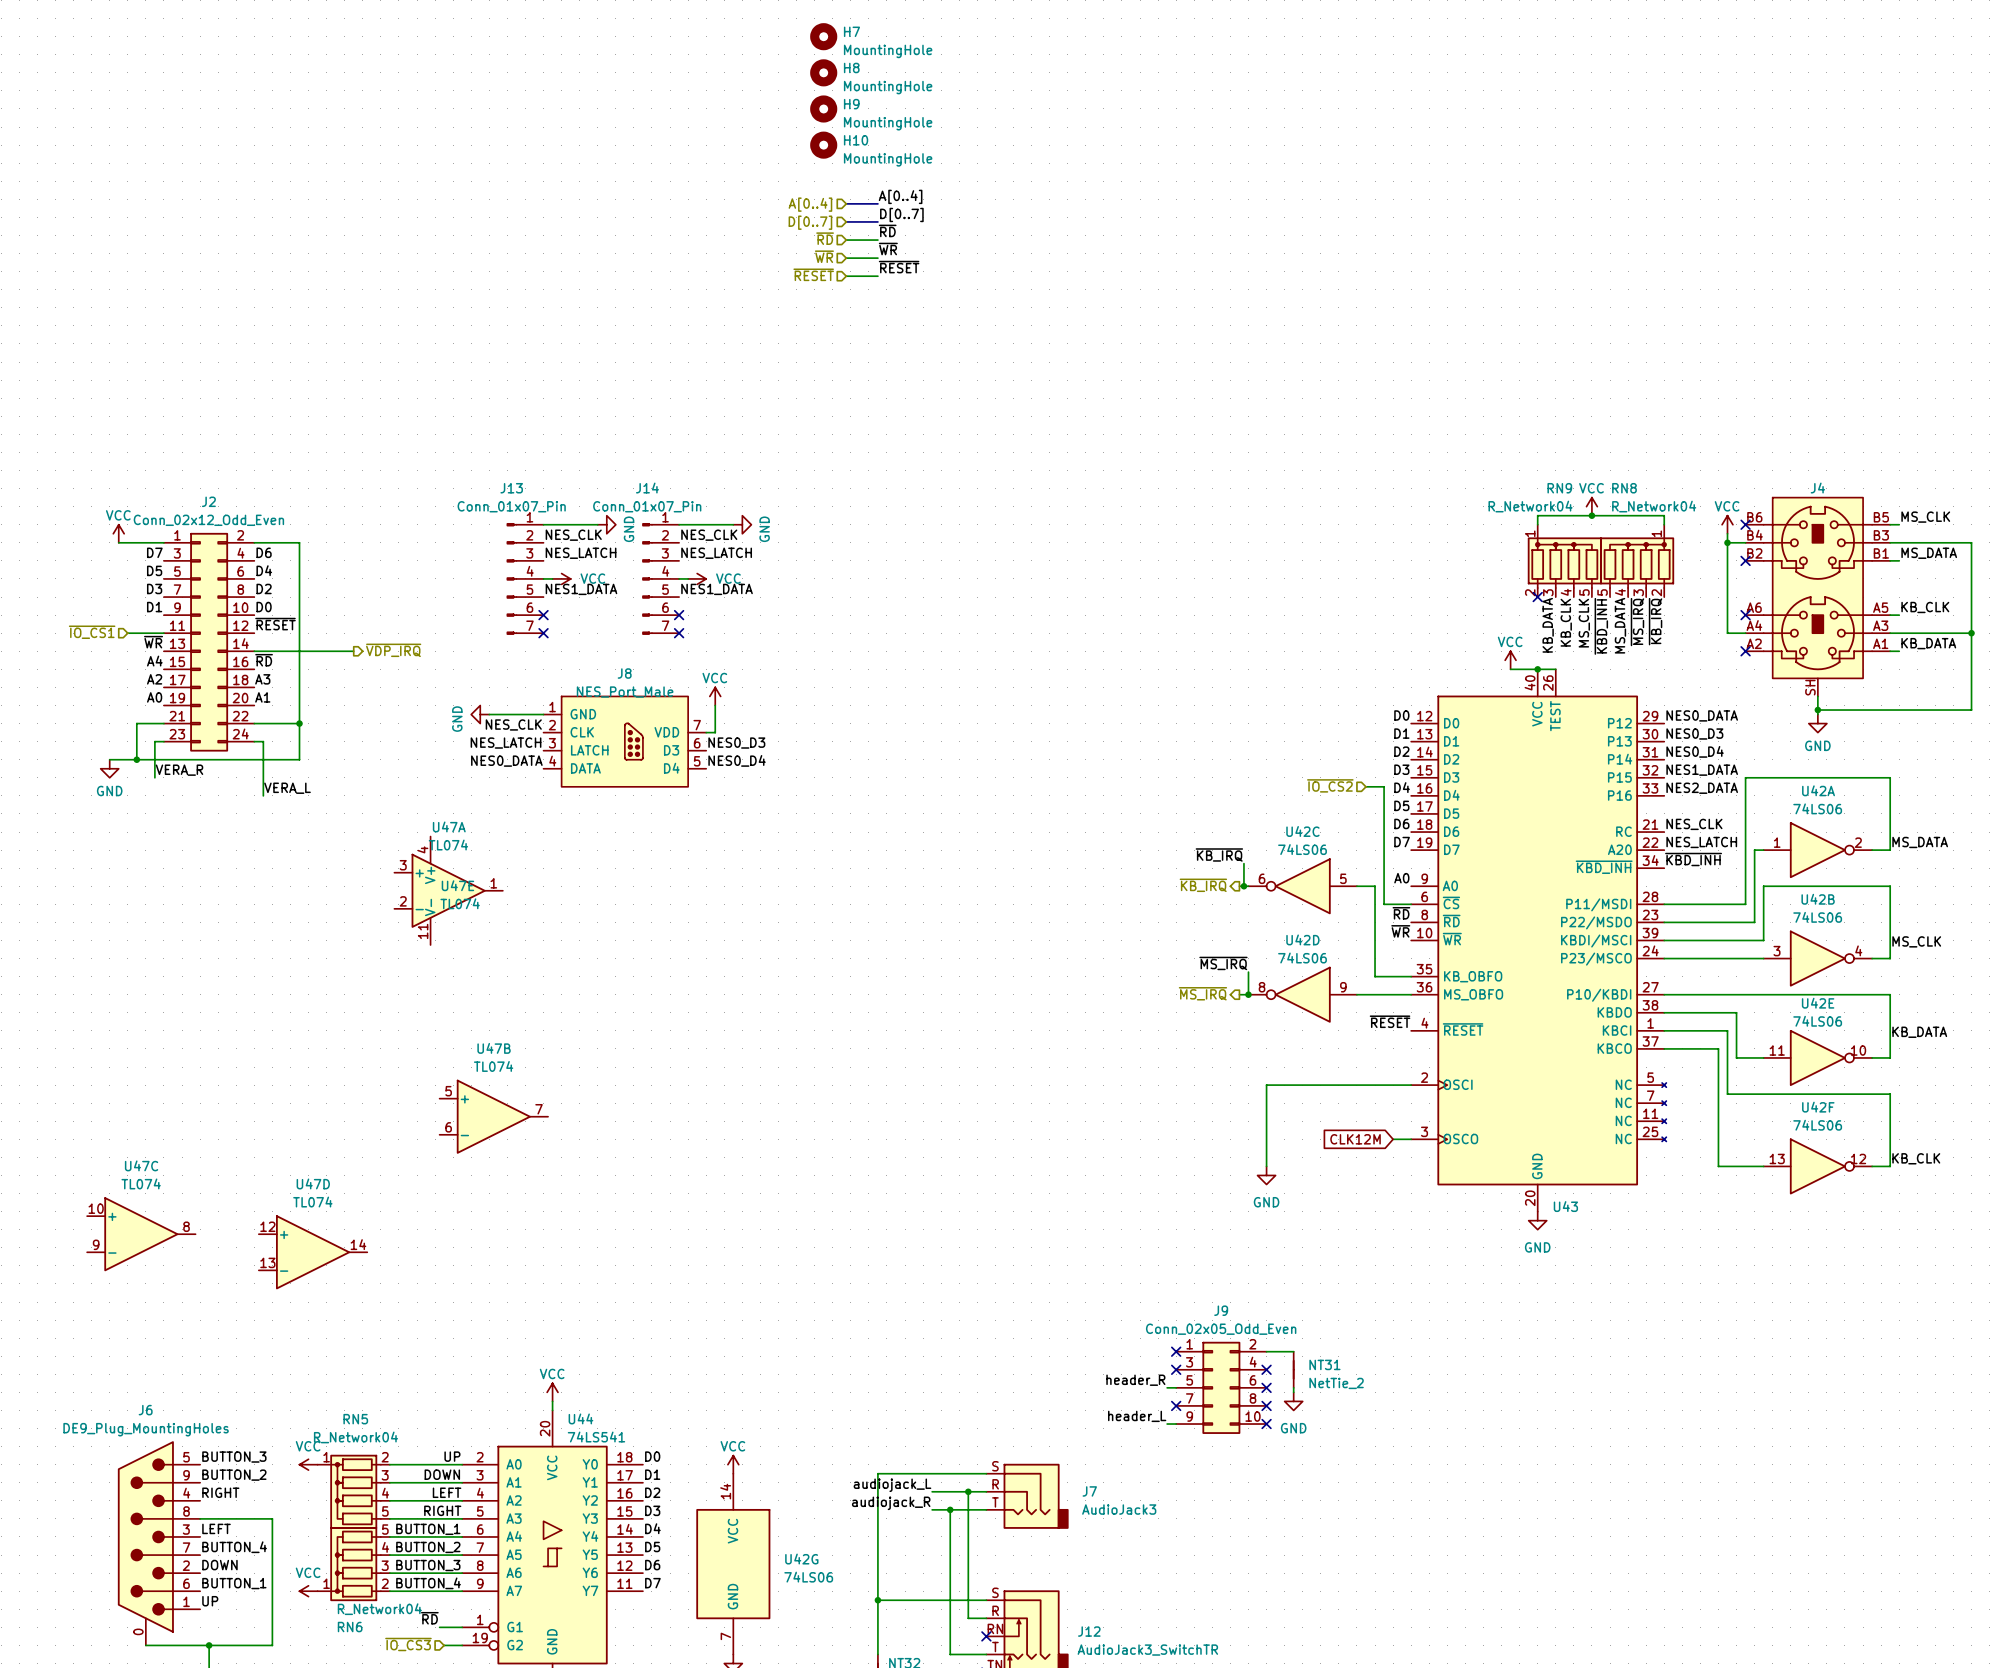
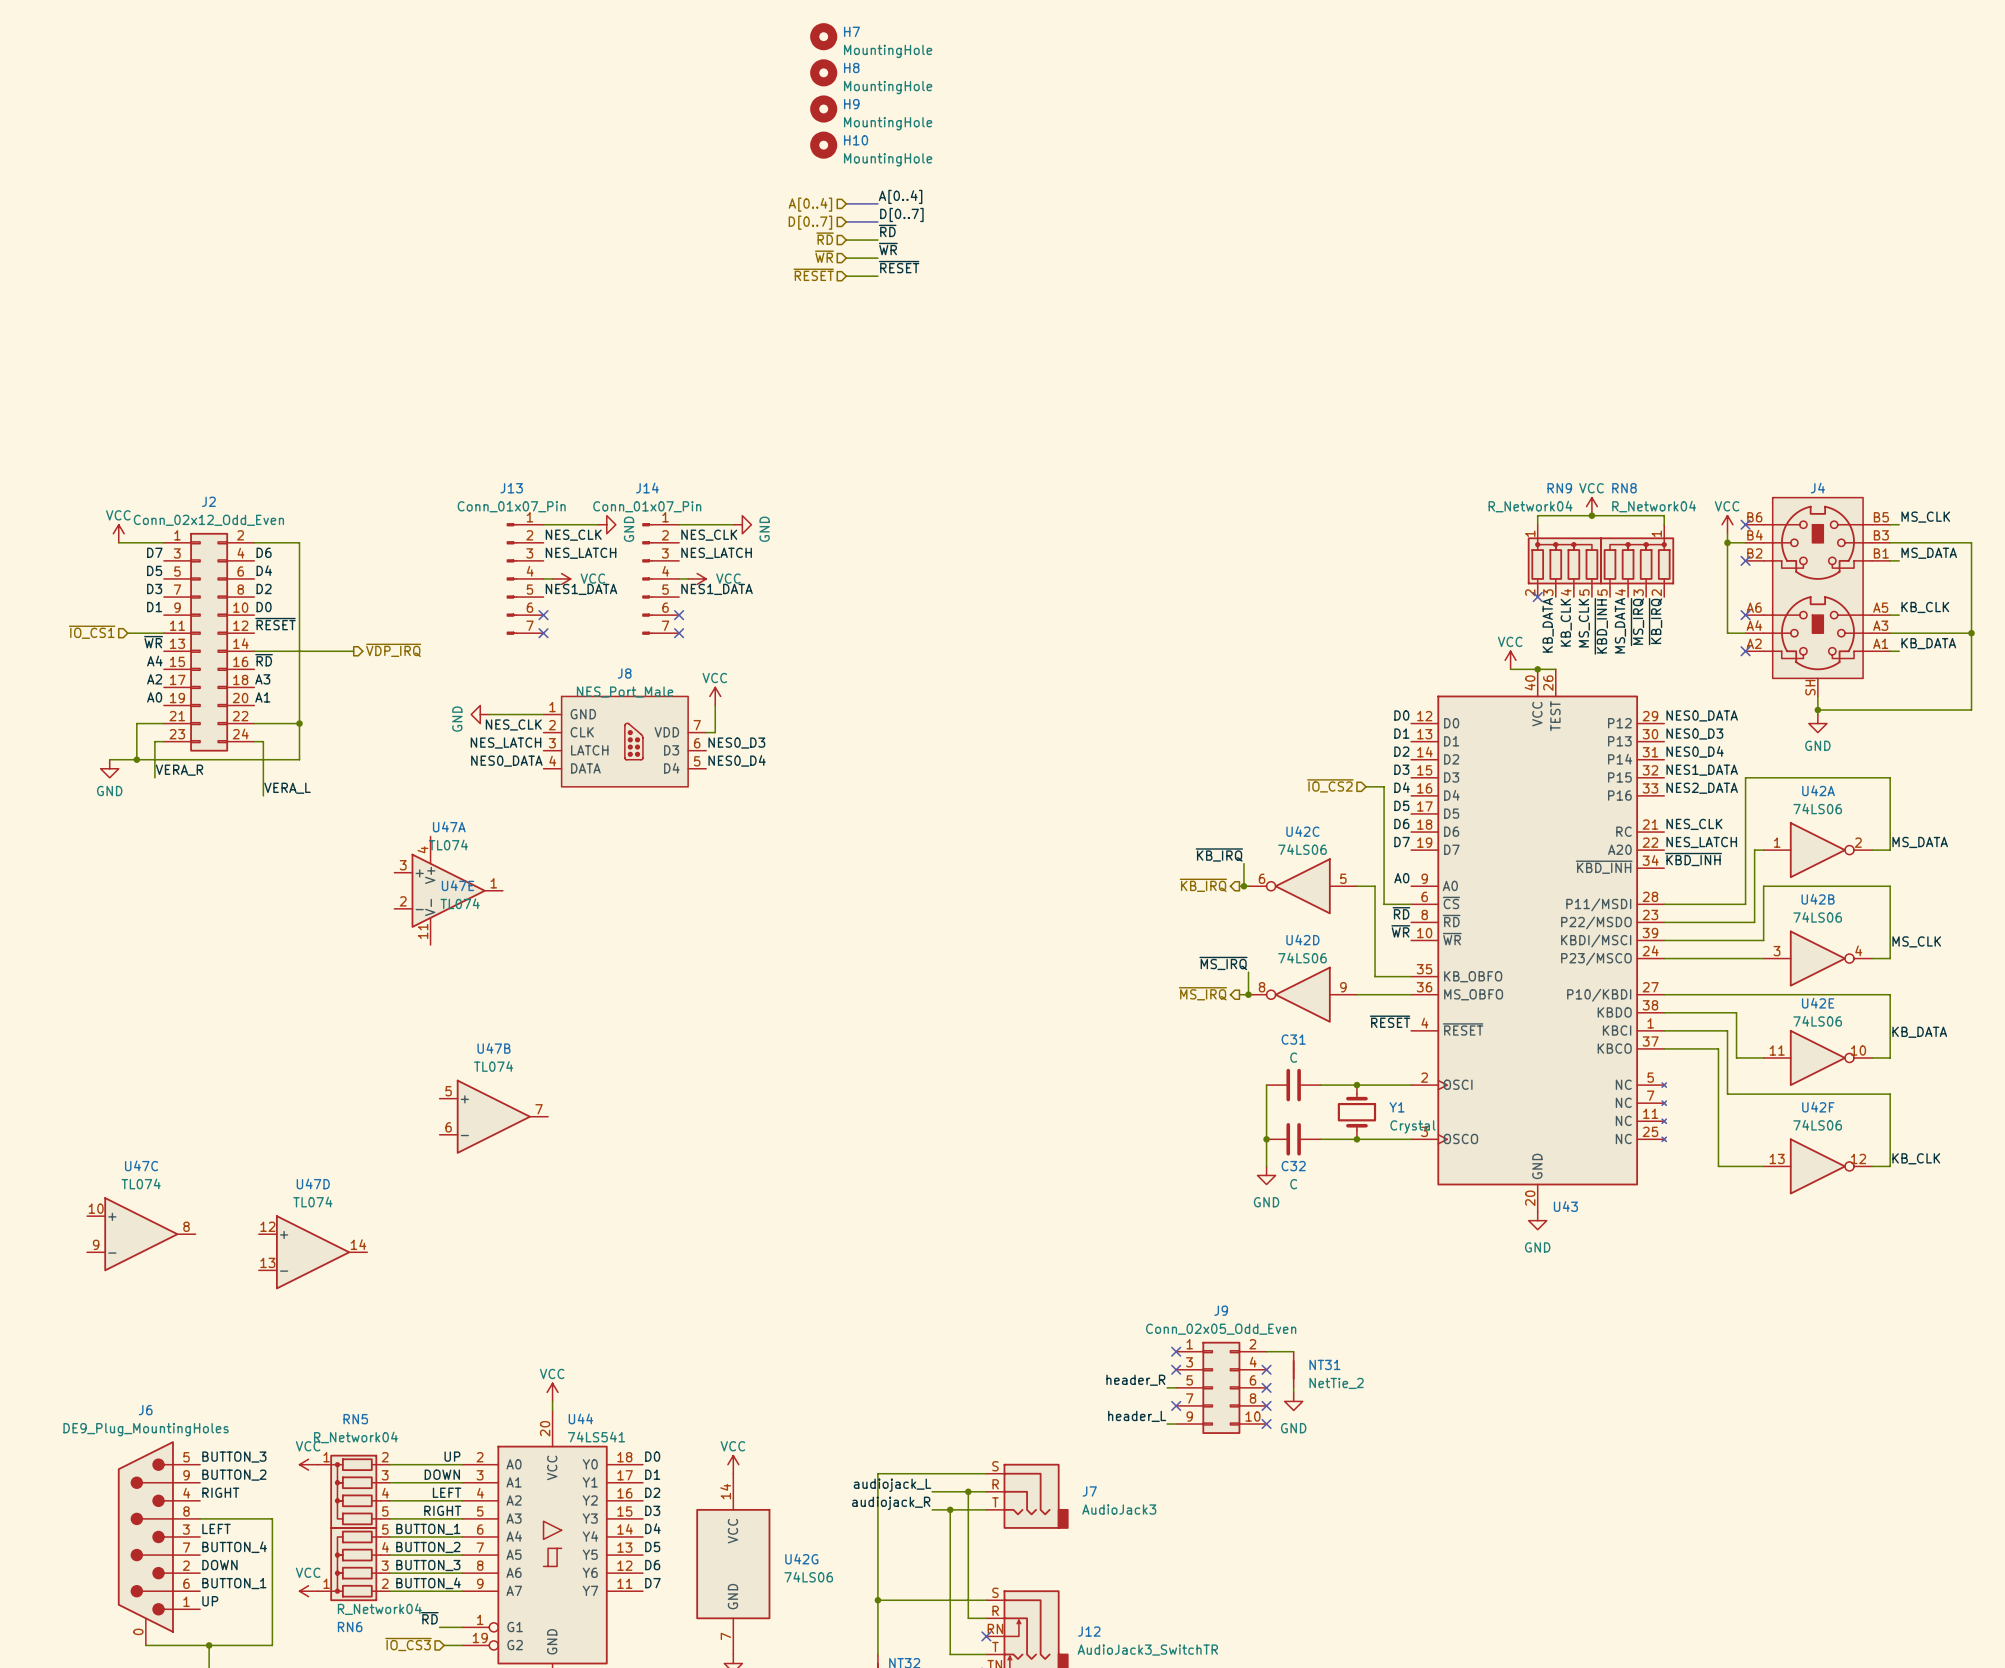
C31: none -> C (1293, 1085)
junction: none -> (1356, 1085)
Y1: none -> Crystal (1356, 1112)
junction: none -> (1266, 1139)
C32: none -> C (1293, 1139)
wire: none -> (1320, 1139) (1393, 1139)
global label: CLK12M (1355, 1139) -> none
junction: none -> (1356, 1139)

